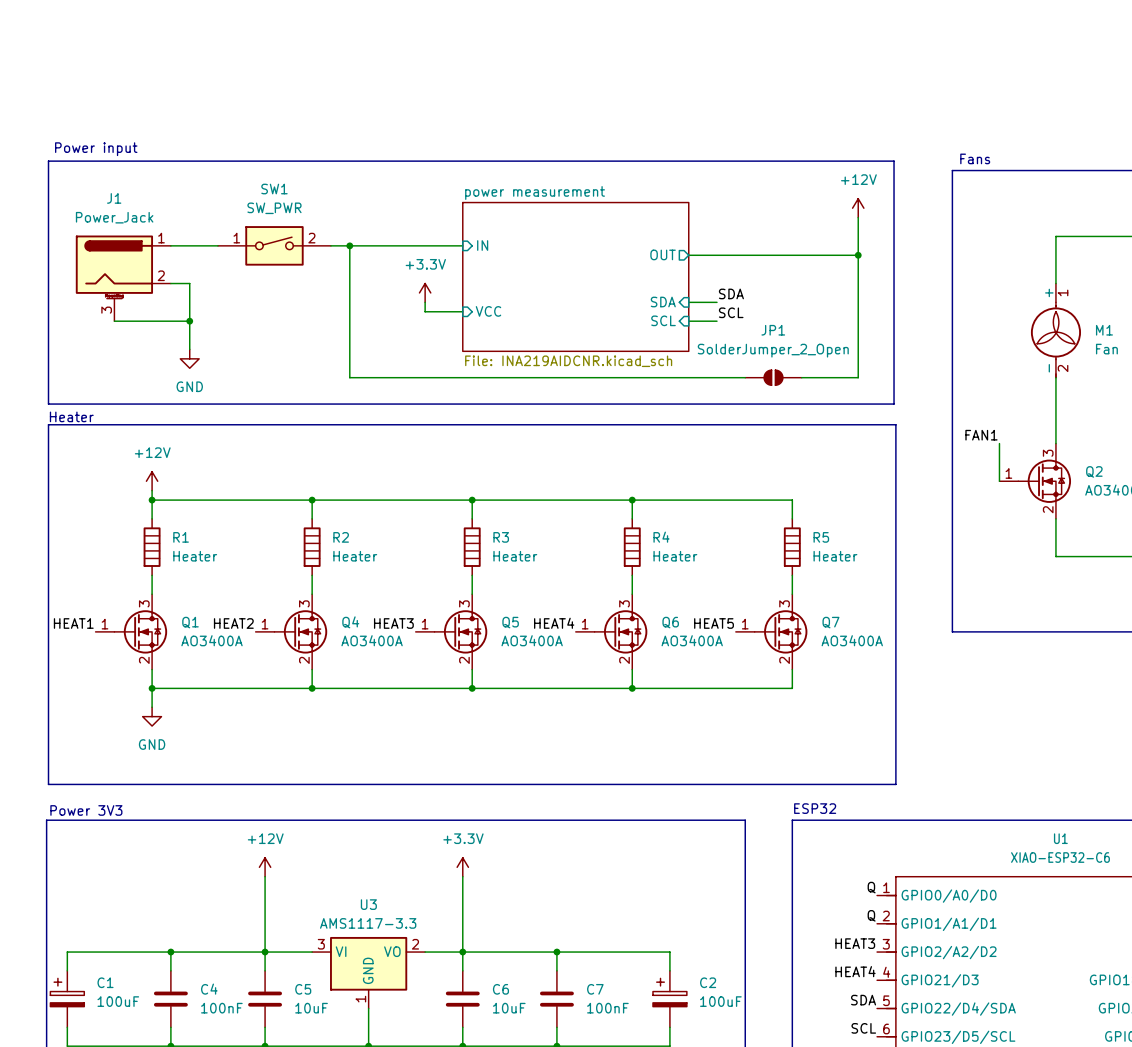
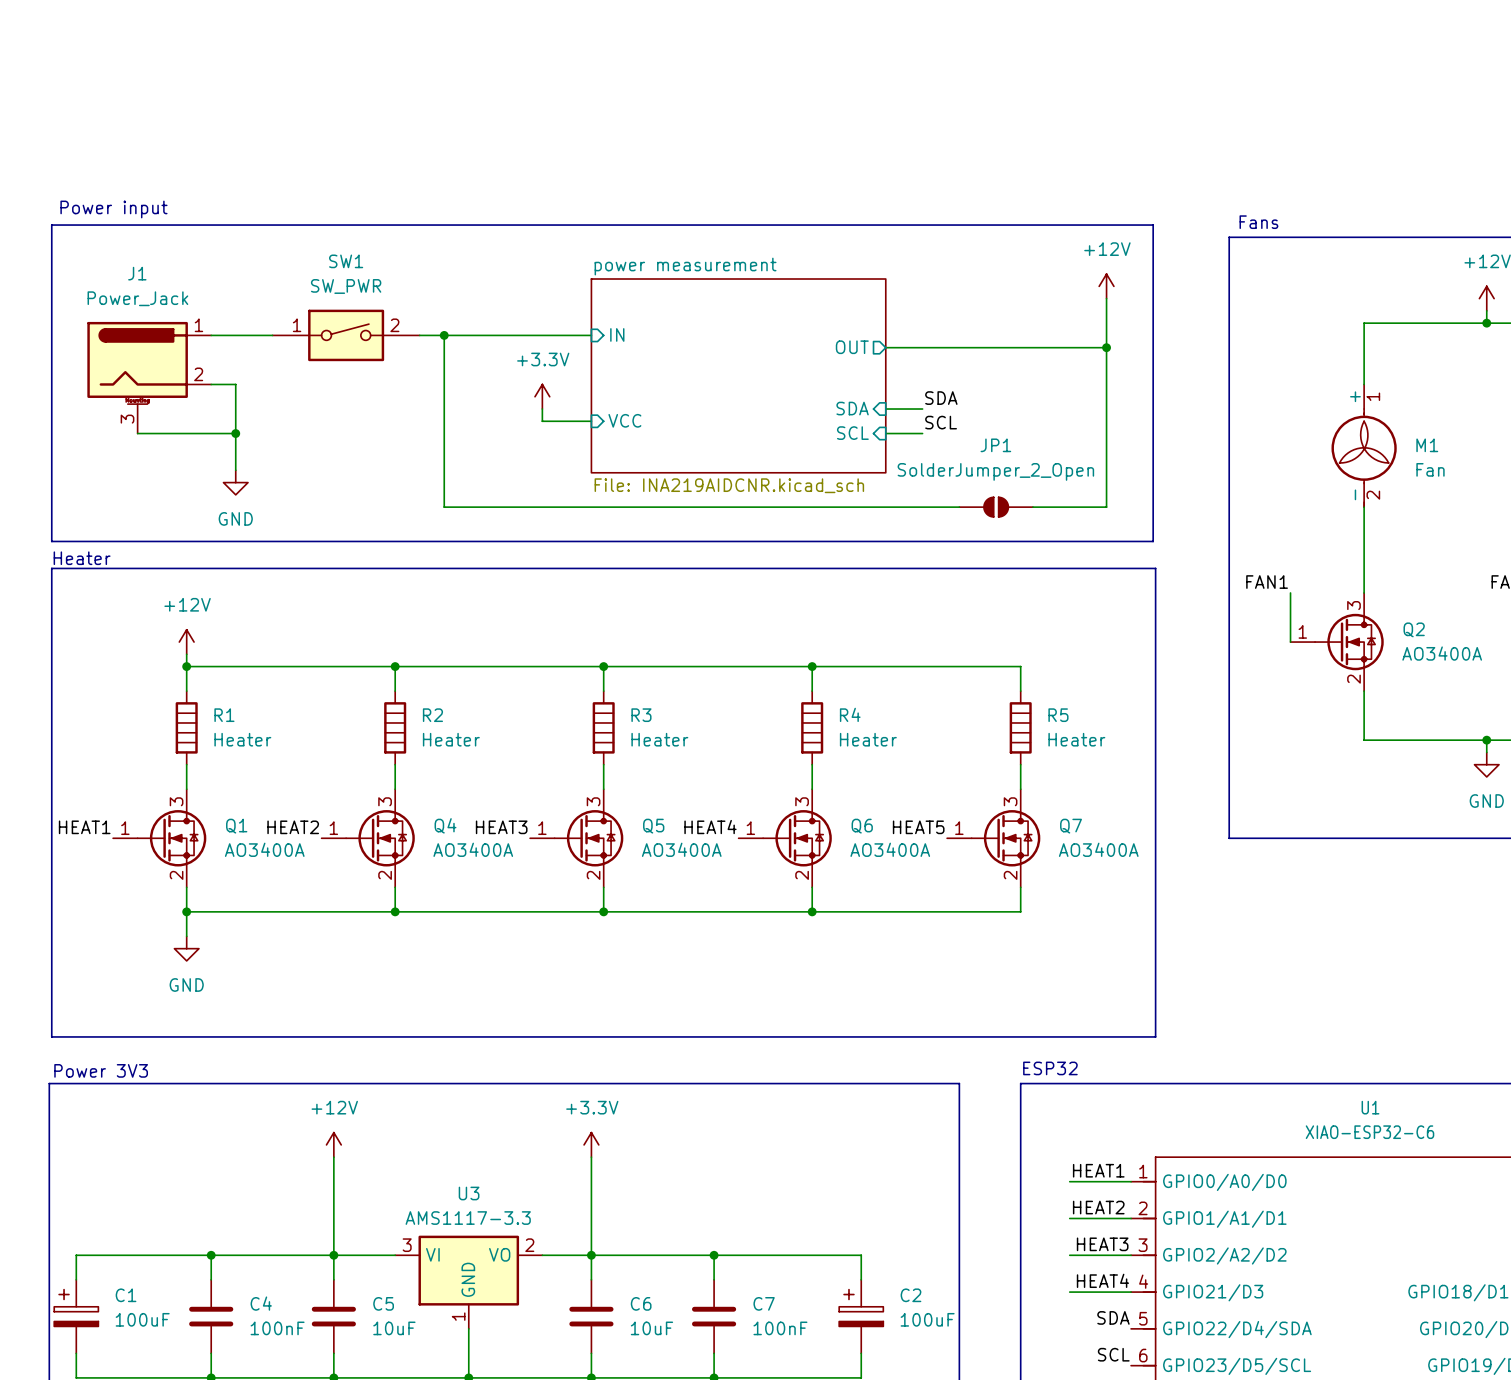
label: none -> HEAT1 (1098, 1170)
label: Q (871, 887) -> none
wire: none -> (1069, 1181) (1131, 1181)
label: none -> HEAT2 (1098, 1207)
label: Q (871, 915) -> none
wire: none -> (1069, 1218) (1131, 1218)
wire: none -> (1069, 1255) (1131, 1255)
wire: none -> (1069, 1292) (1131, 1292)

